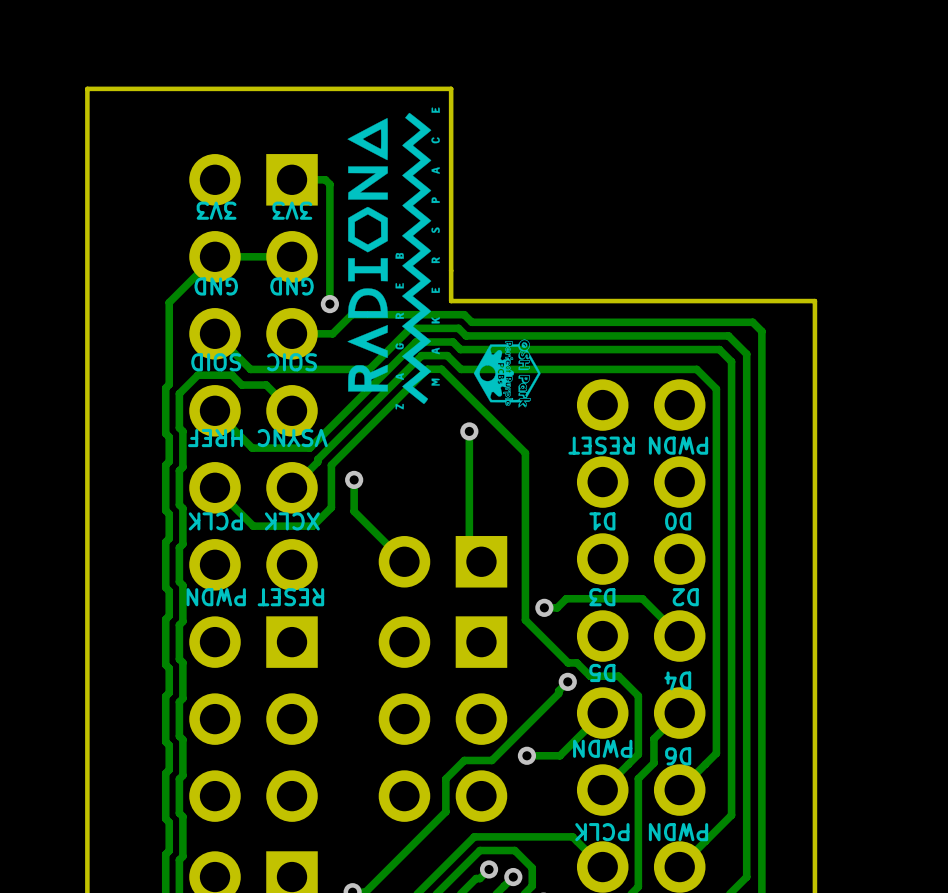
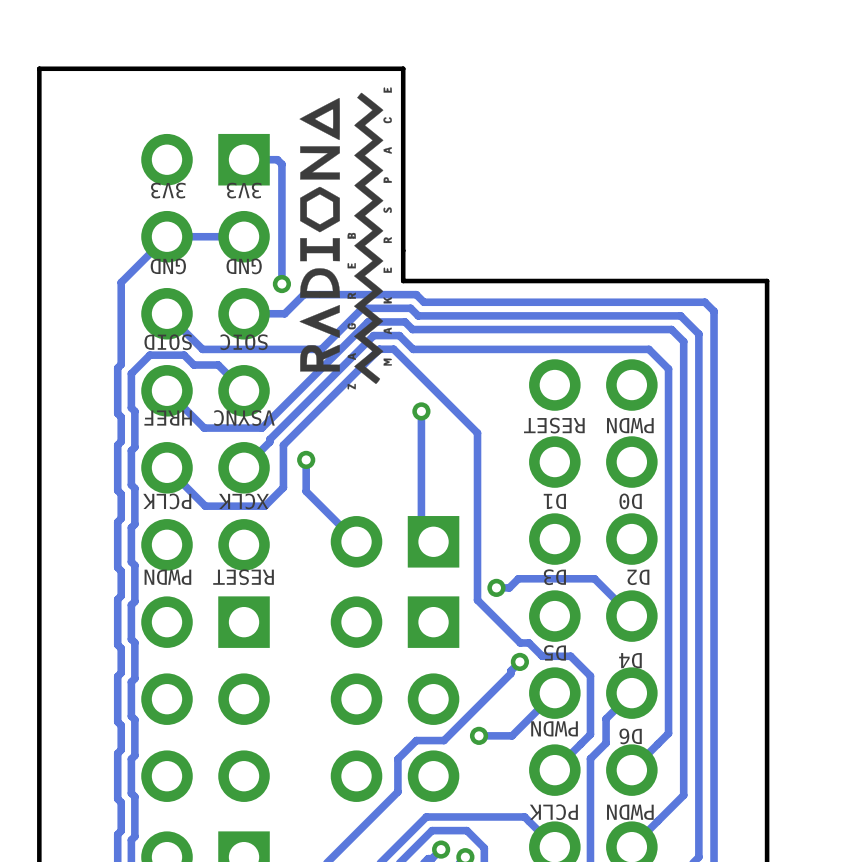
drawing: [473, 339, 541, 408] -> none

